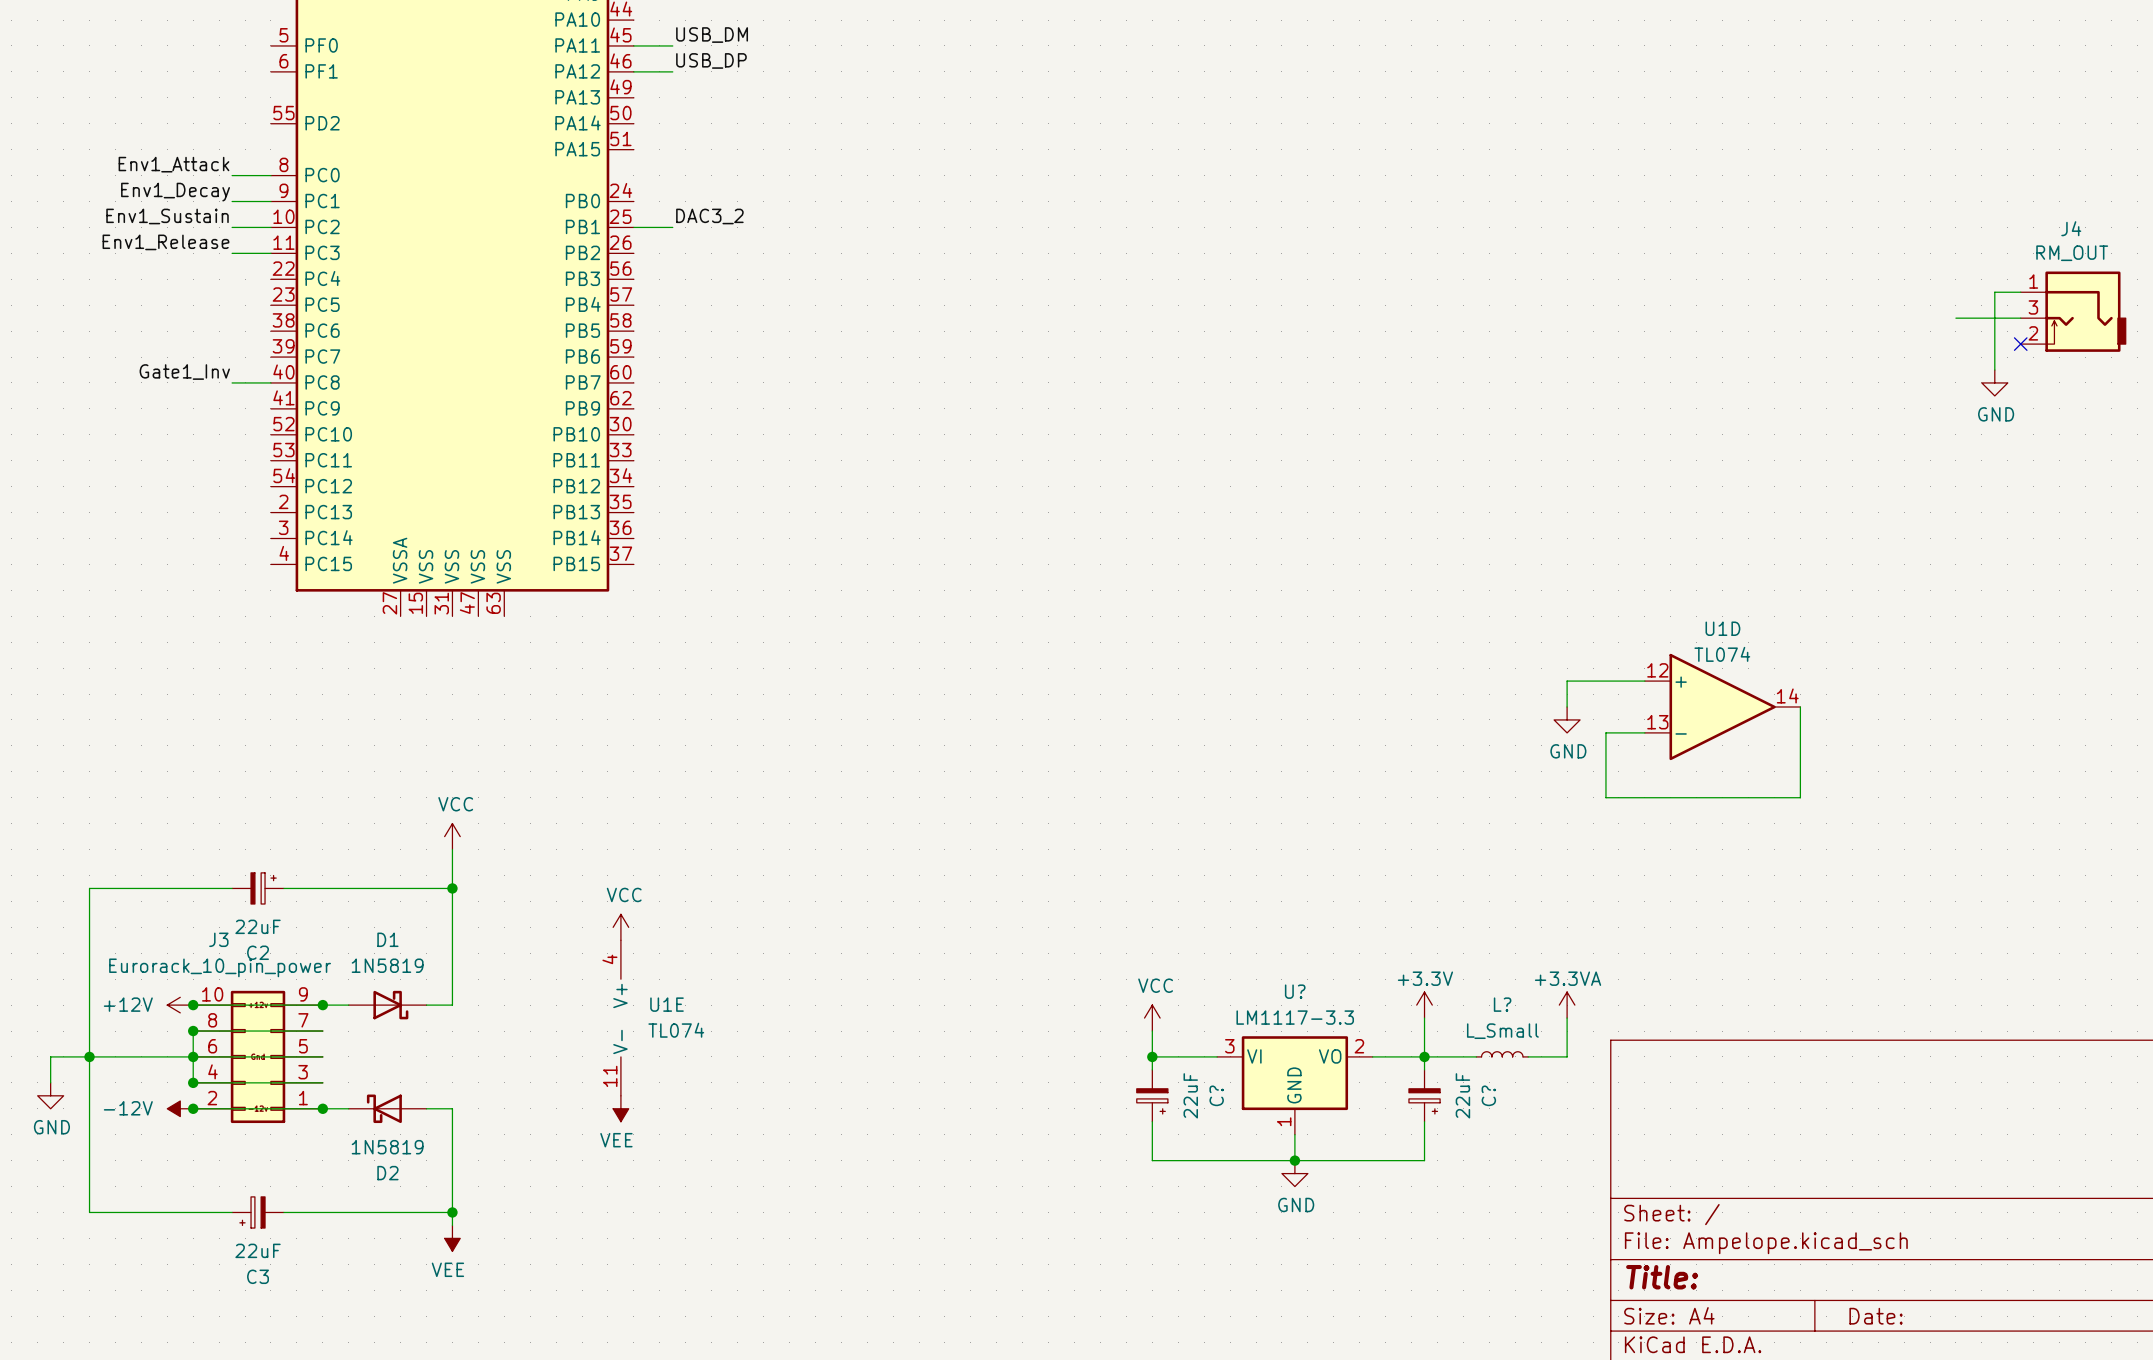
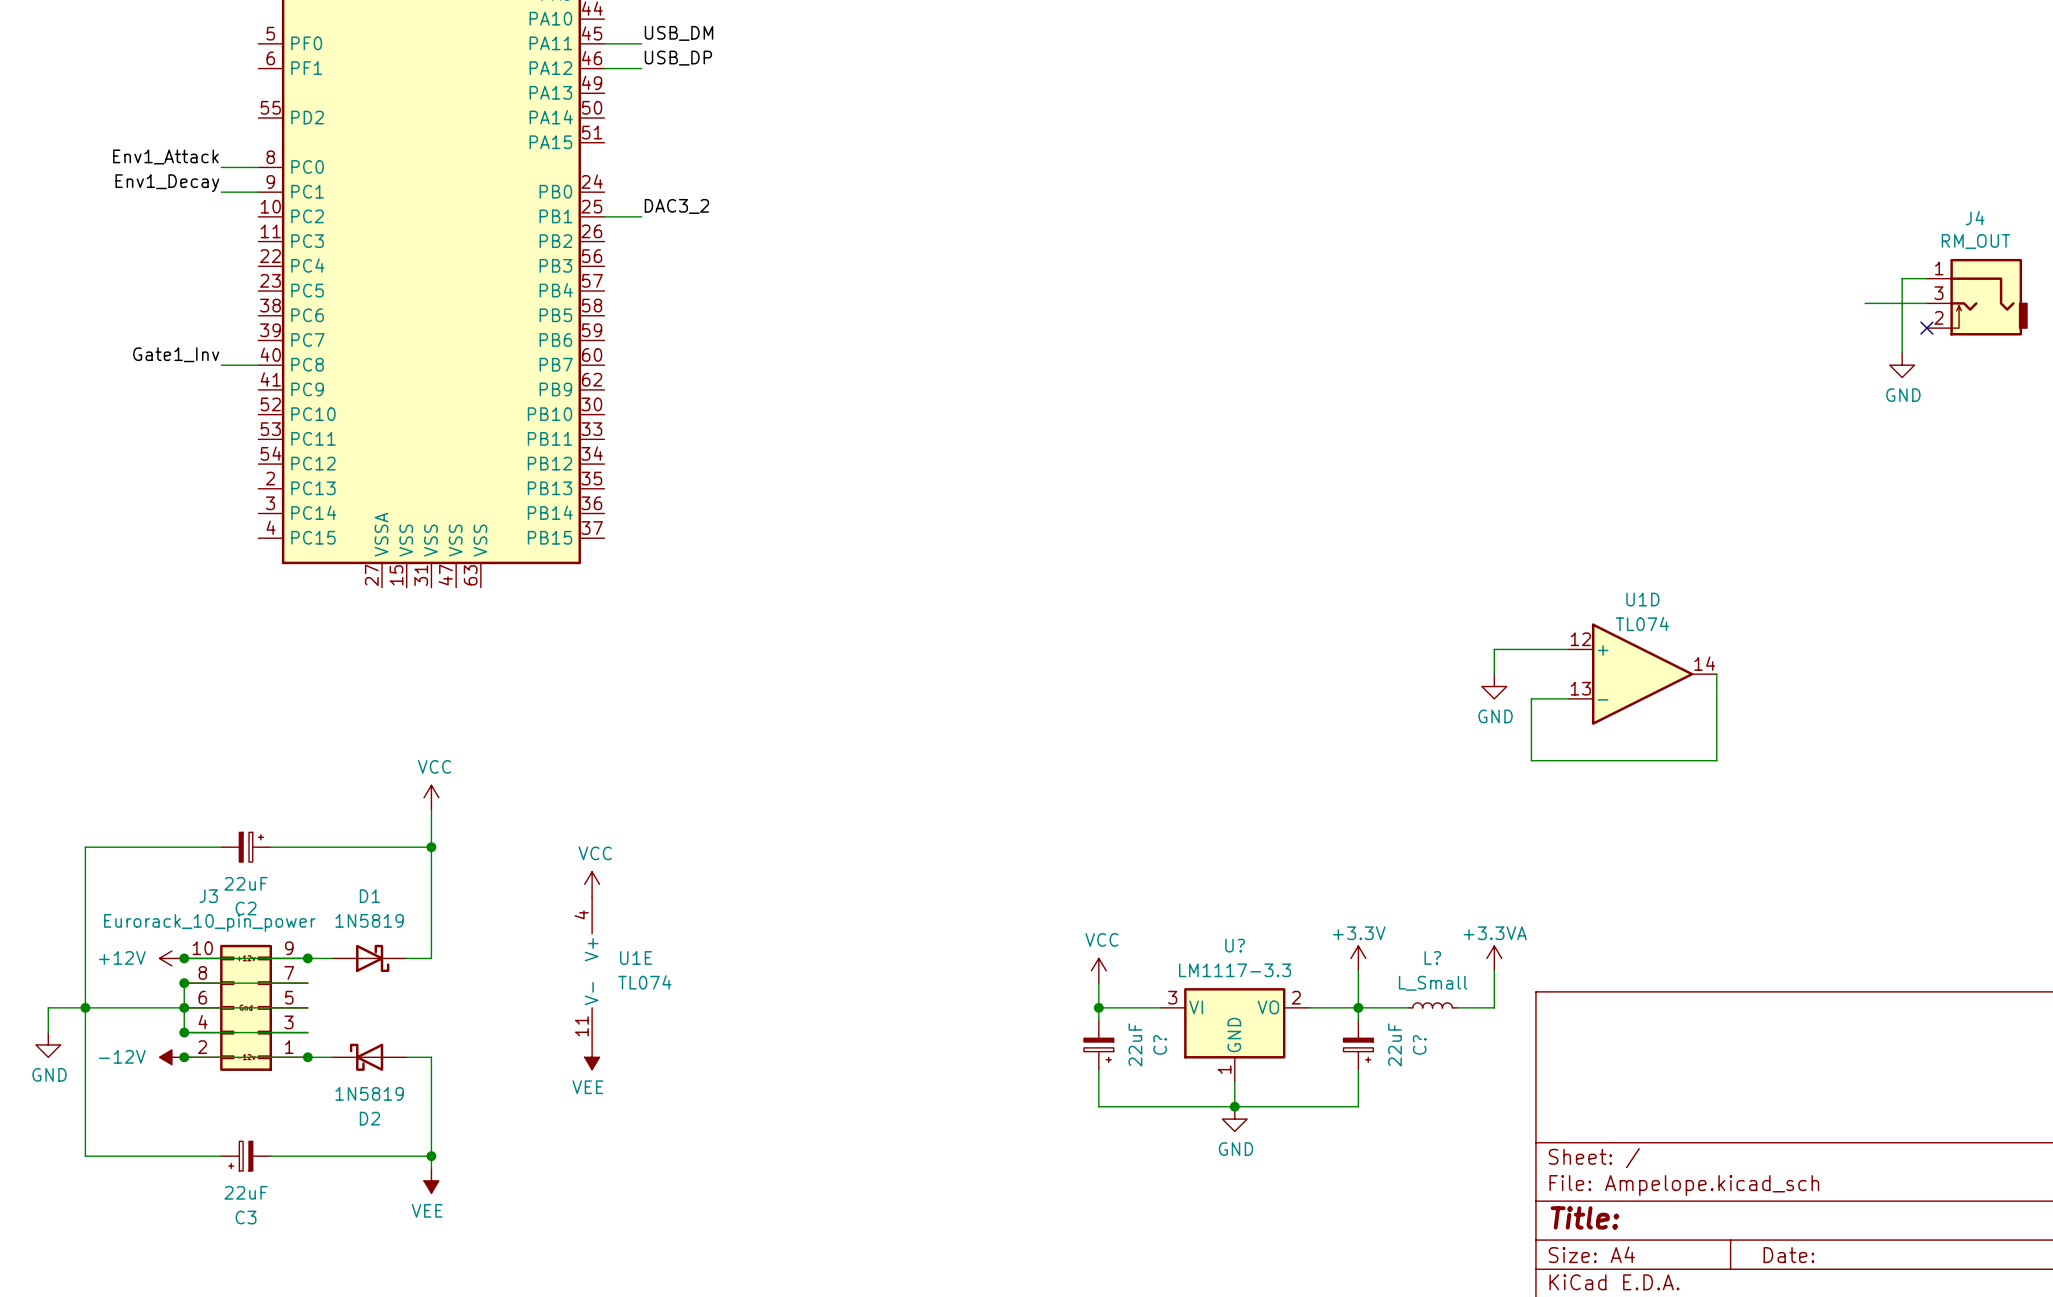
label: Env1_Sustain (167, 216) -> none
wire: (232, 227) (270, 227) -> none
label: Env1_Release (165, 242) -> none
wire: (232, 253) (270, 253) -> none

